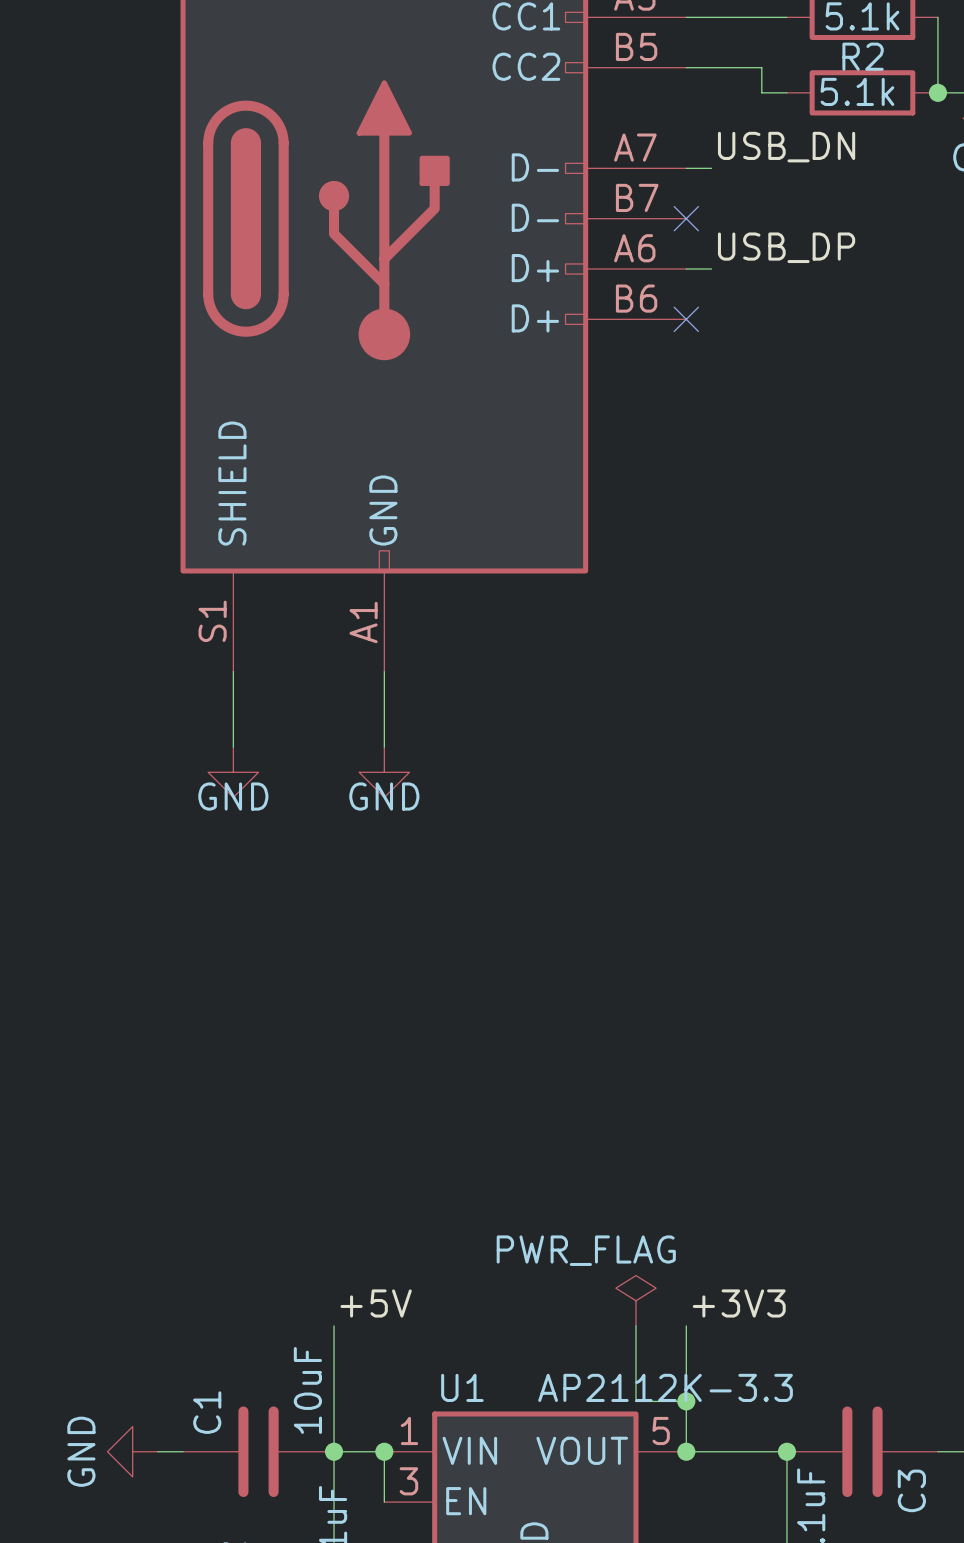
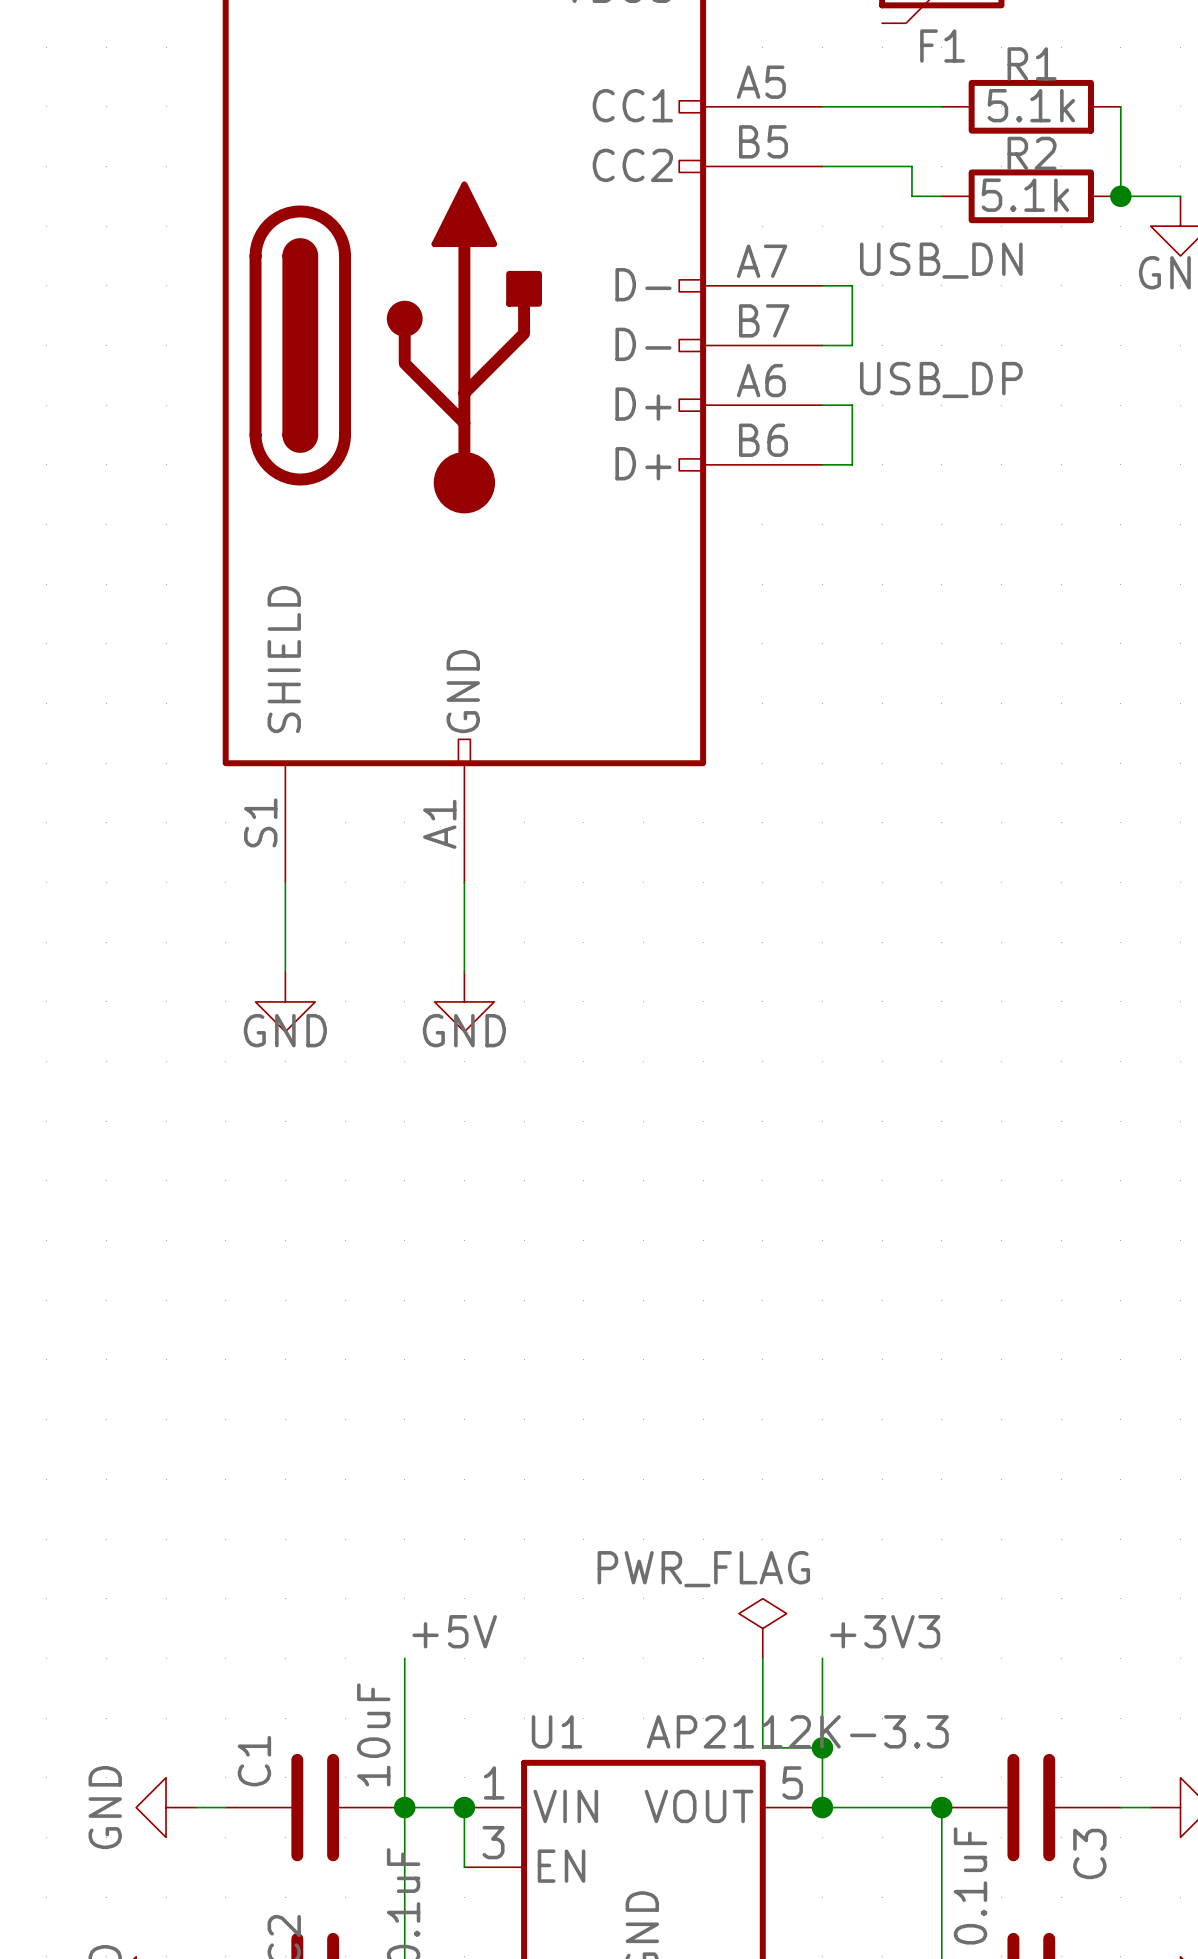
wire: none -> (852, 285) (852, 345) (822, 345)
no-connect mark: (686, 218) -> none
wire: none -> (852, 405) (852, 464) (822, 464)
no-connect mark: (686, 319) -> none

